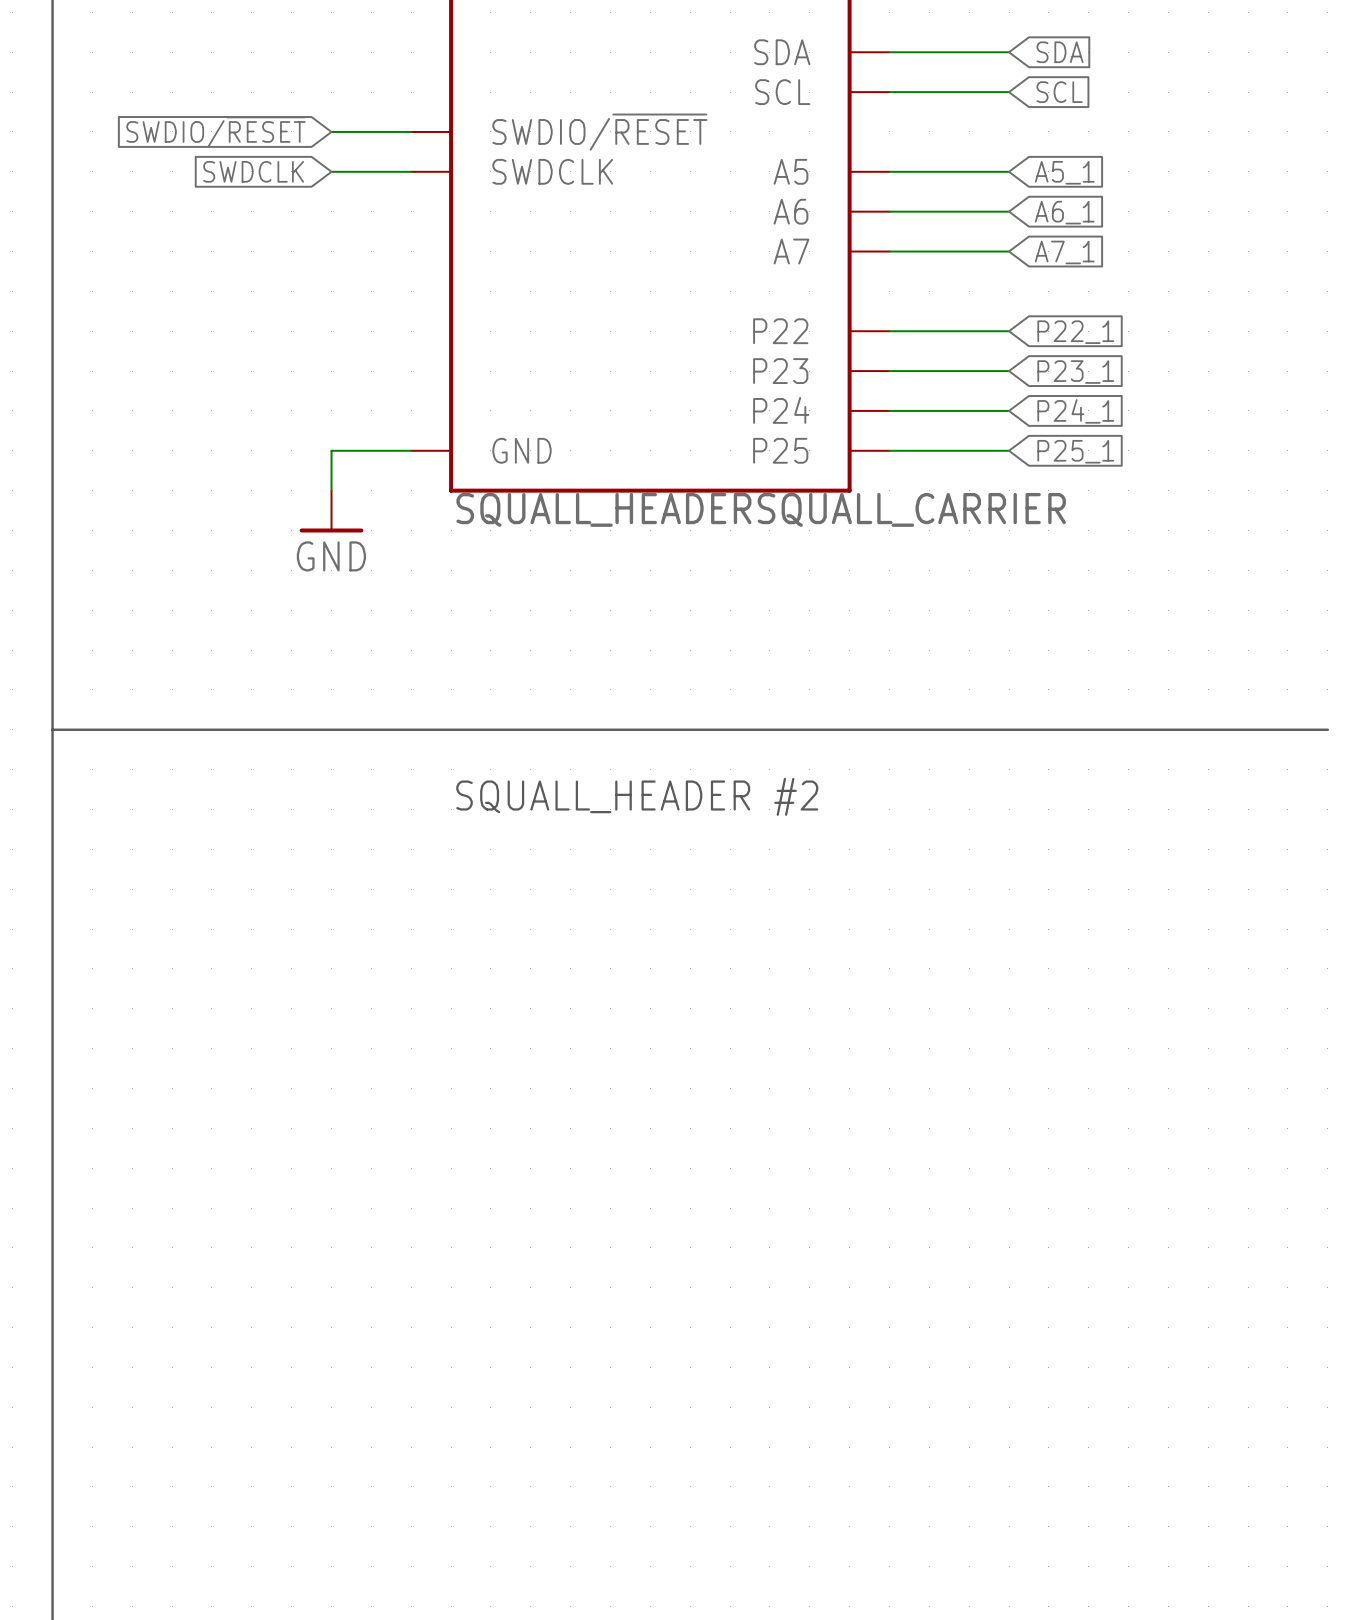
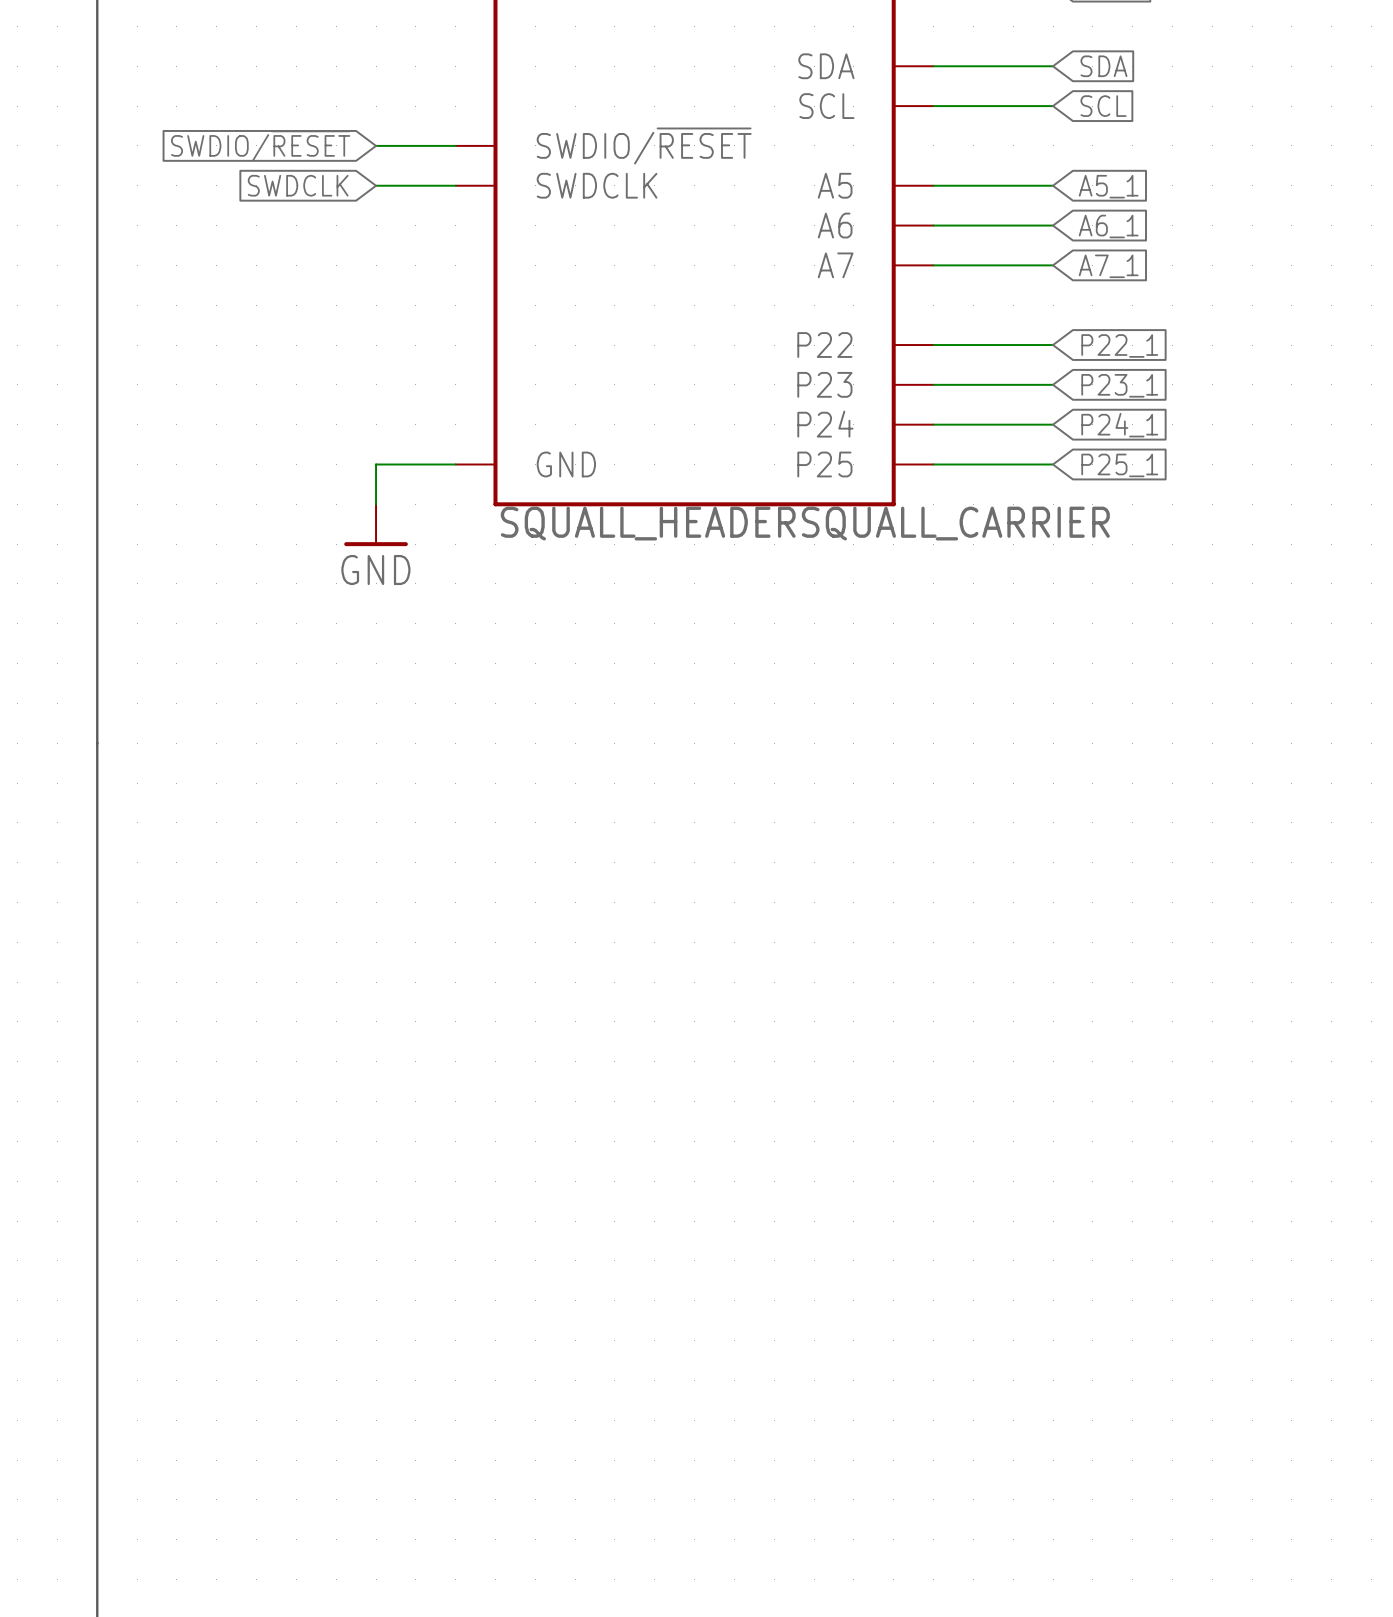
line: (52, 729) (1327, 729) -> none
text: SQUALL_HEADER #2 (637, 796) -> none

